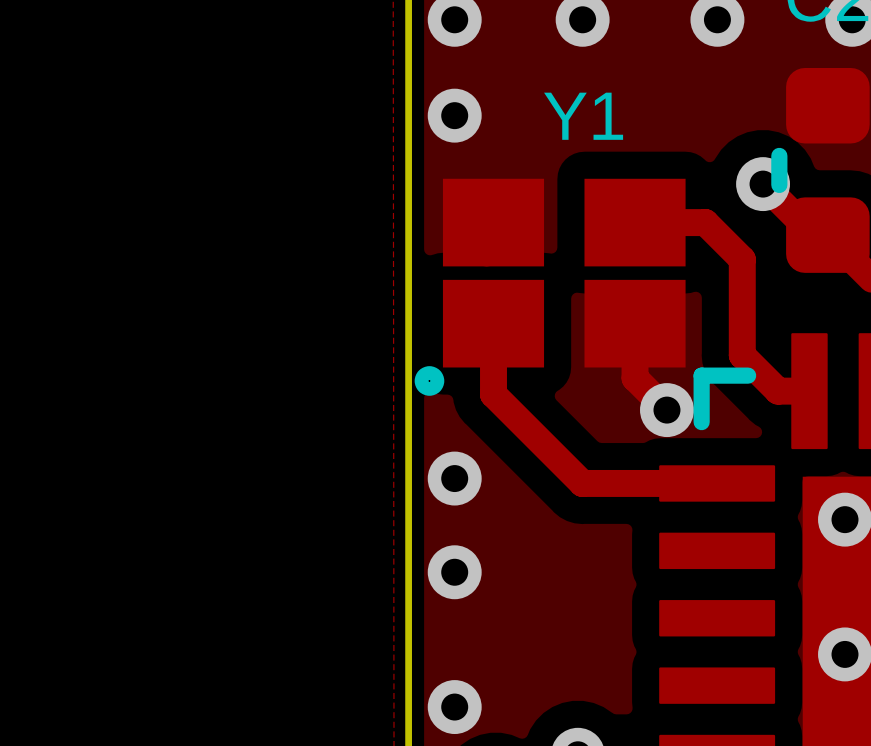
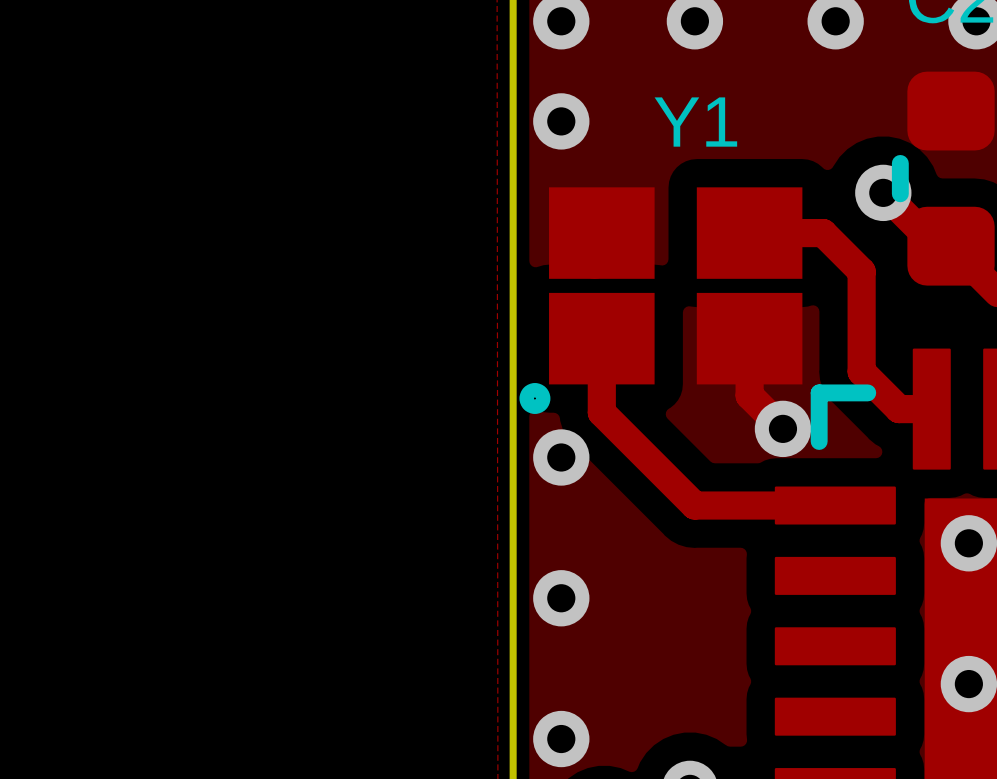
via position: (454, 478) -> (561, 457)

